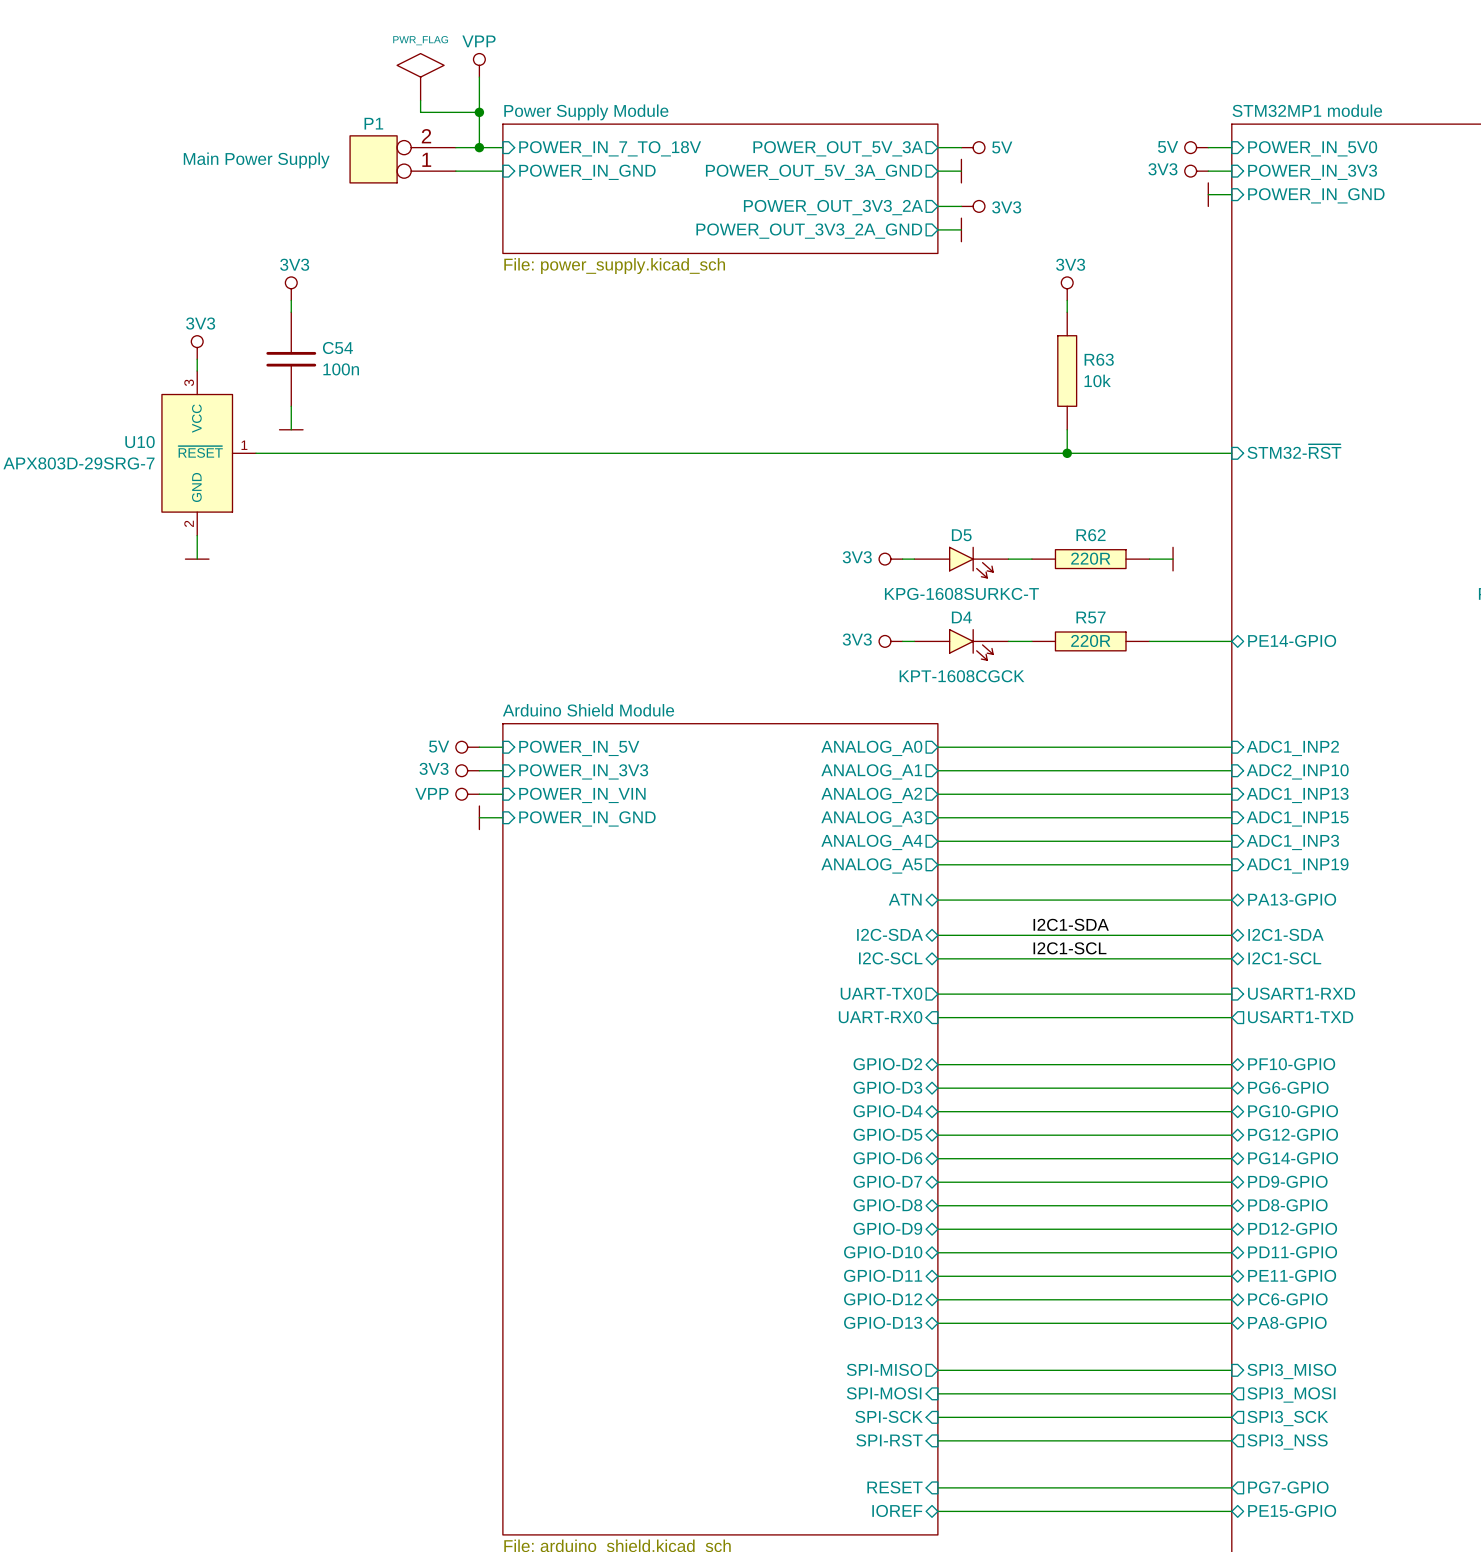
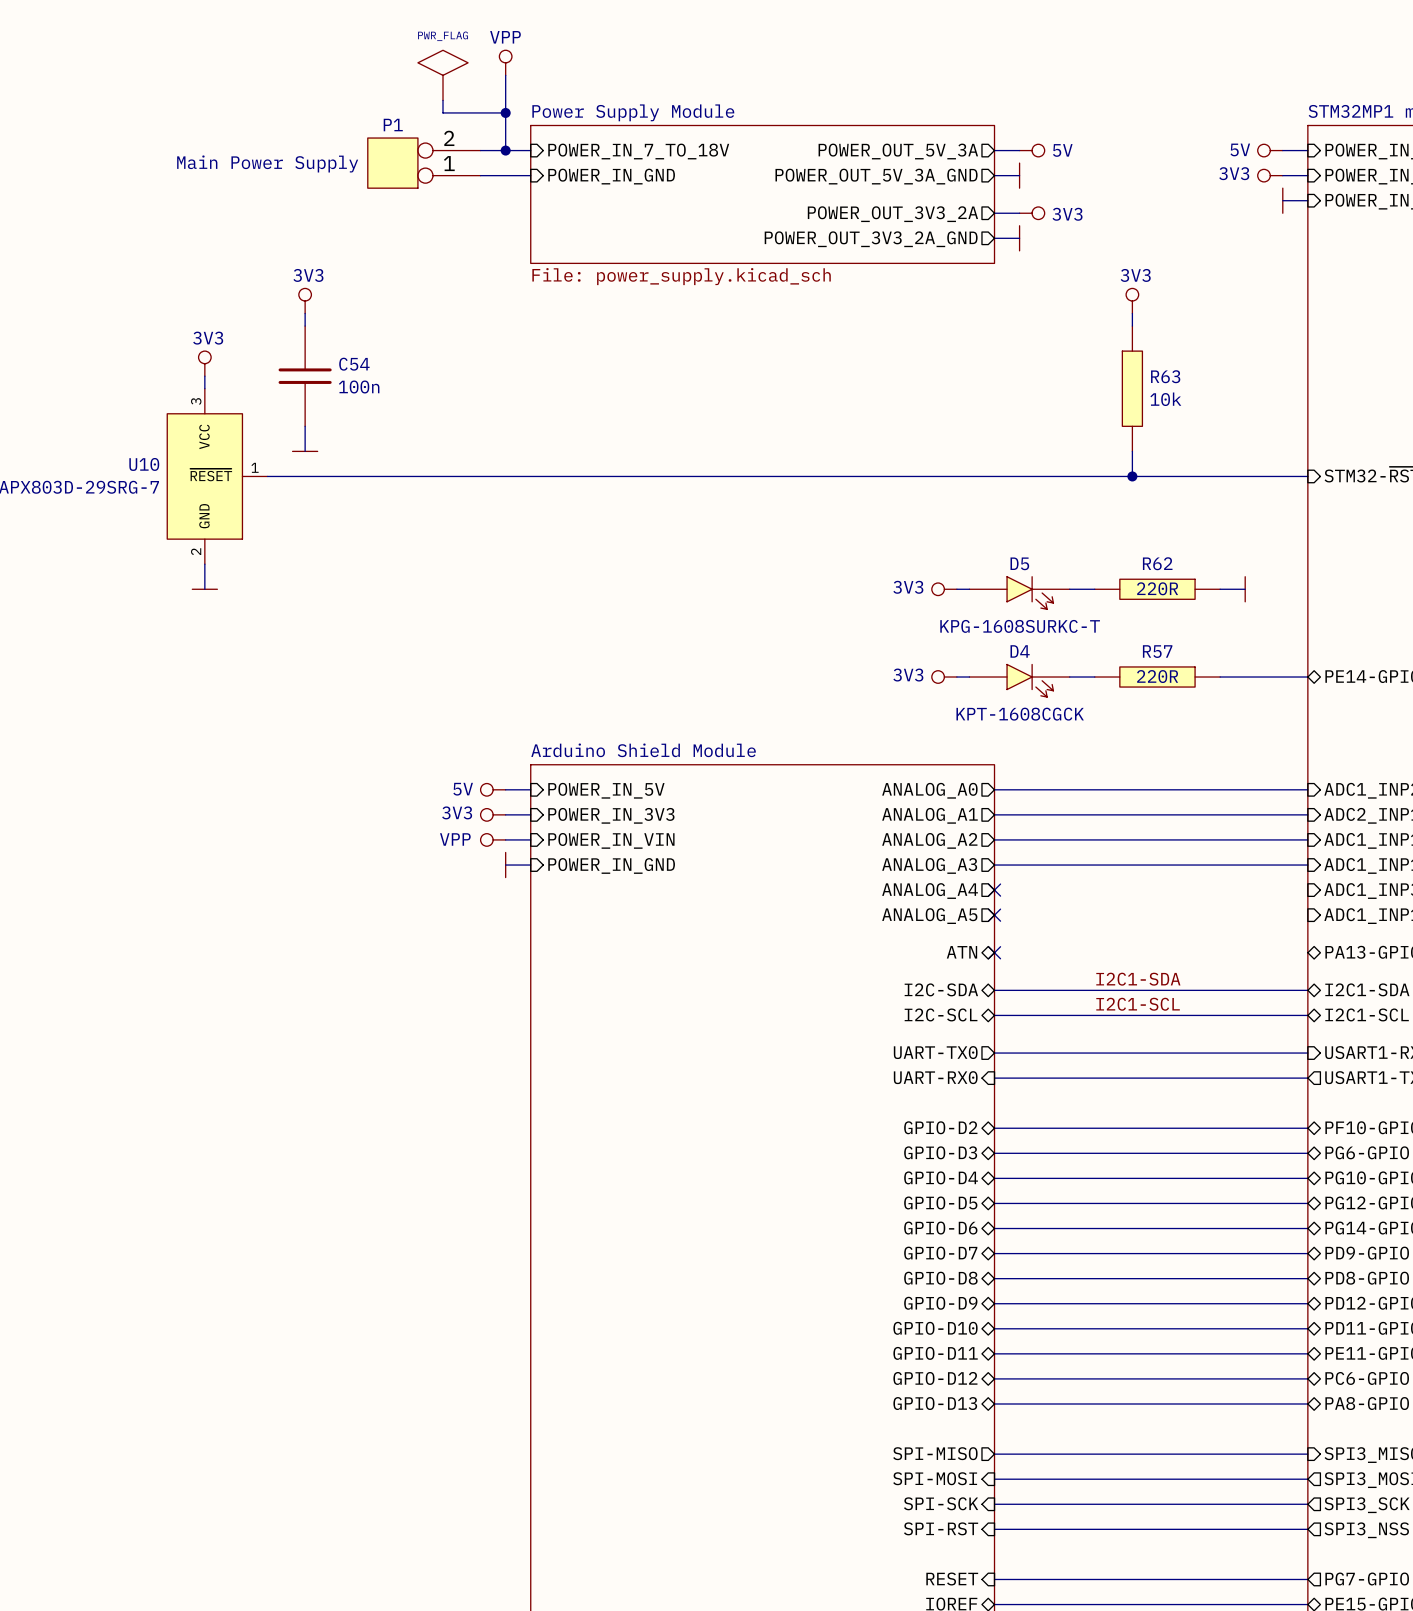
wire: (937, 841) (1231, 841) -> none
no-connect mark: none -> (994, 890)
wire: (937, 864) (1231, 864) -> none
no-connect mark: none -> (994, 915)
wire: (937, 900) (1231, 900) -> none
no-connect mark: none -> (994, 952)

